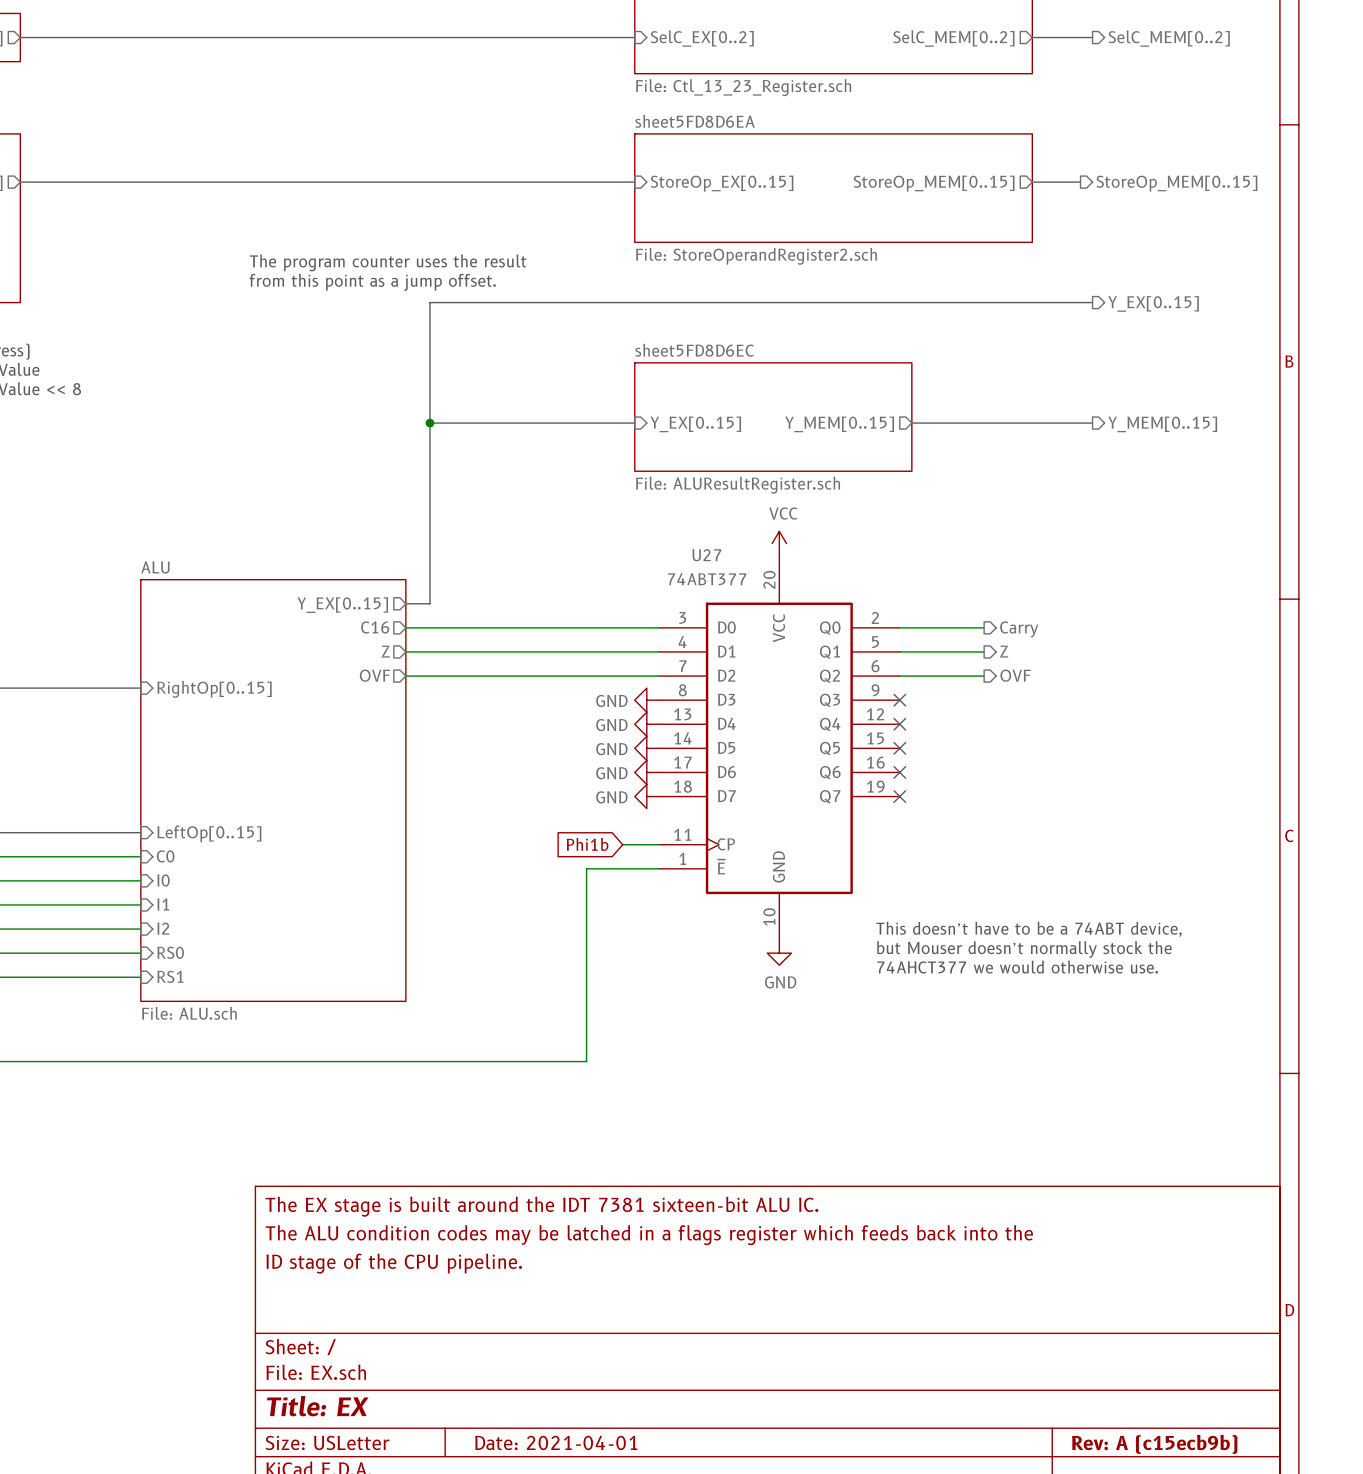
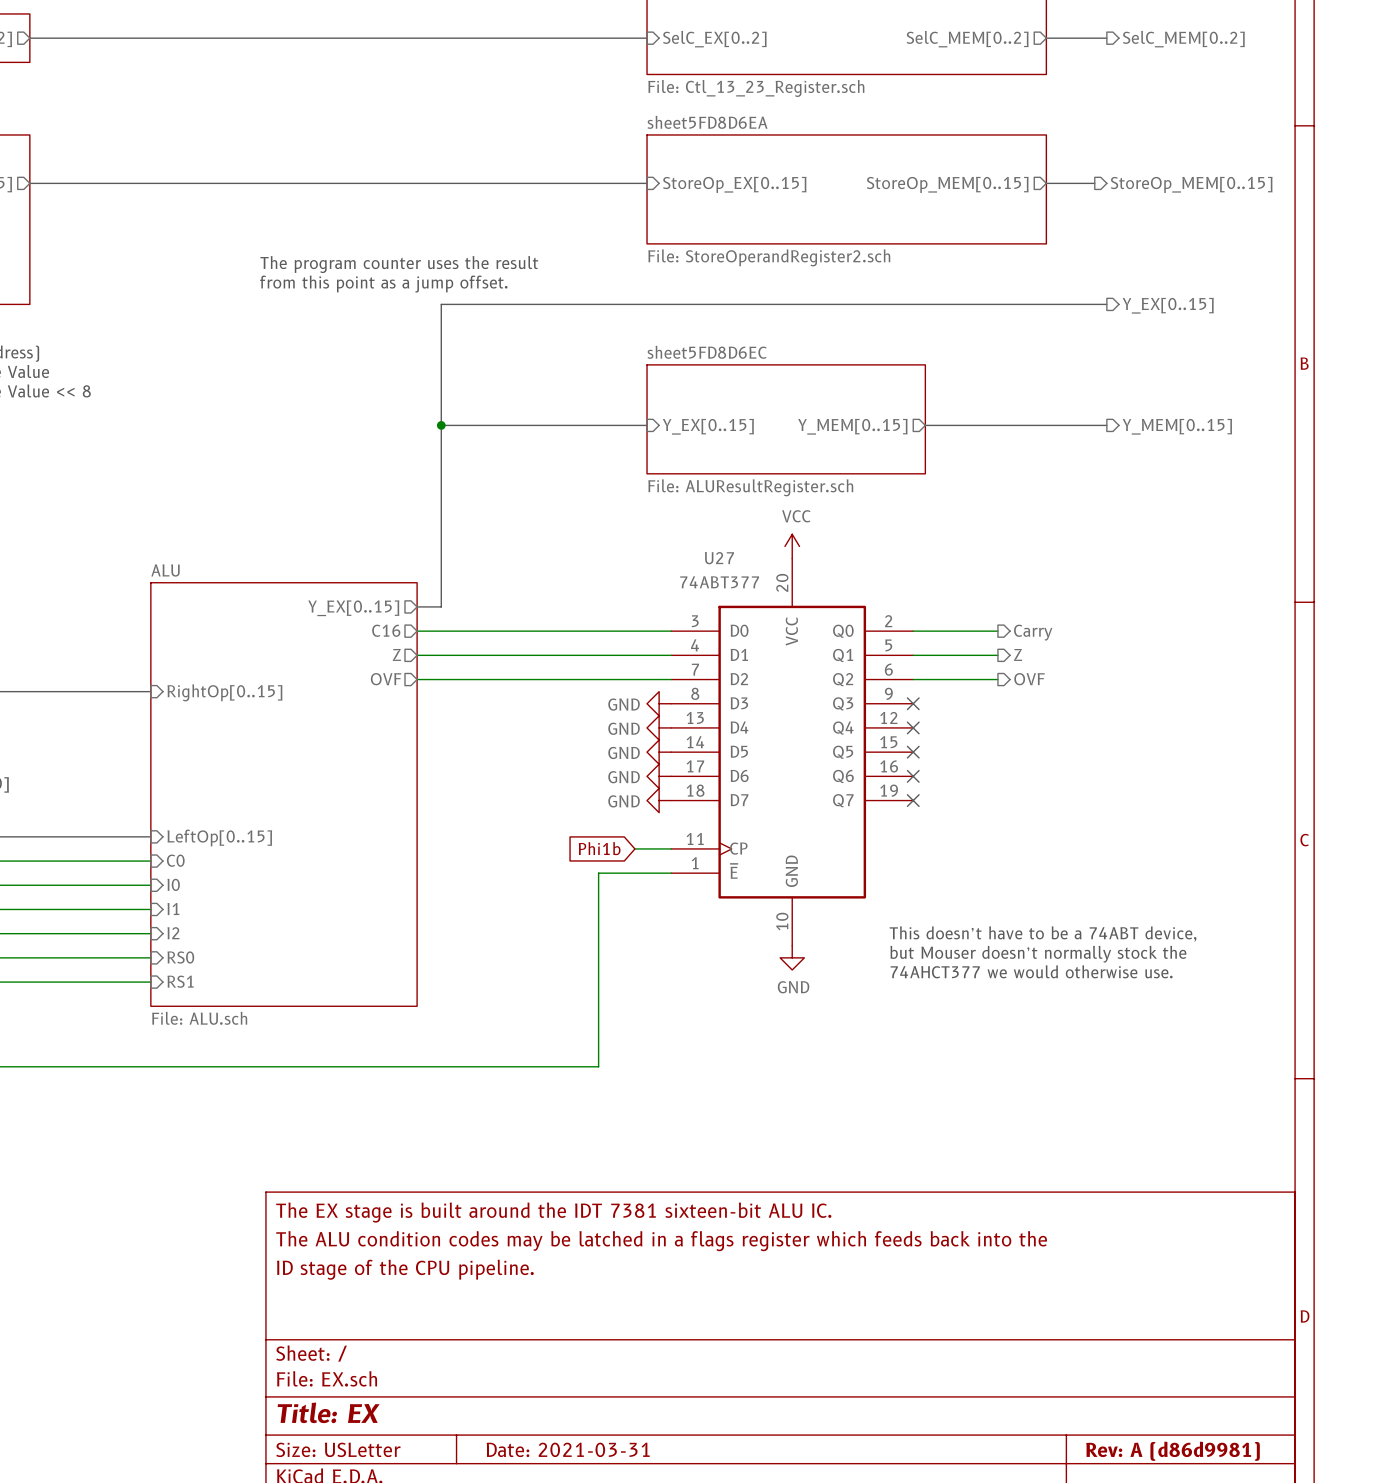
title block: Date: 2021-04-01 (556, 1442) -> Date: 2021-03-31 (568, 1449)
title block: Rev: A (c15ecb9b) (1154, 1444) -> Rev: A (d86d9981) (1173, 1451)

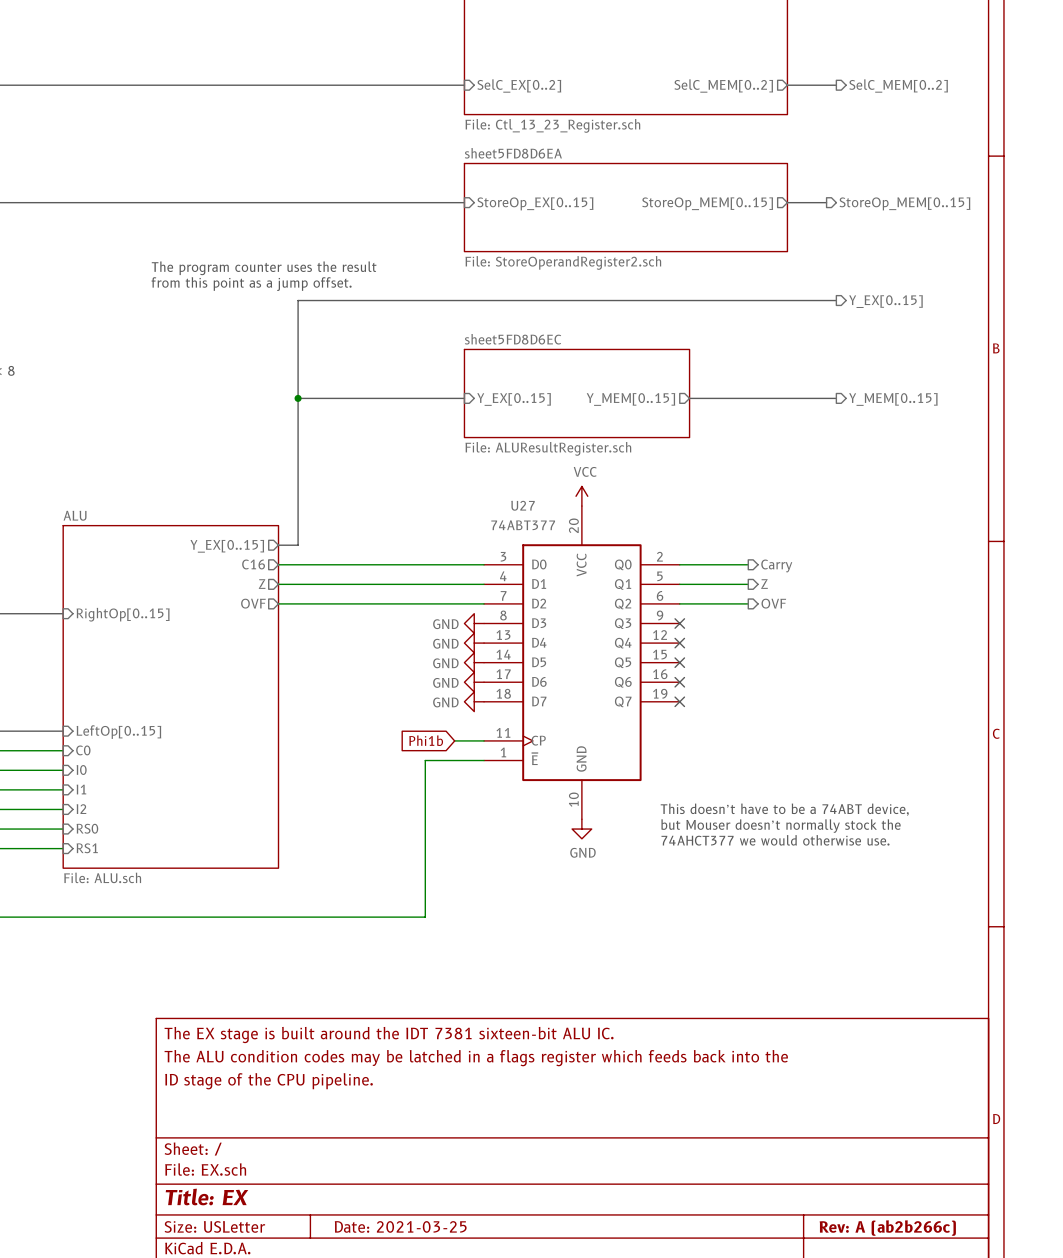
title block: Date: 2021-03-31 (568, 1449) -> Date: 2021-03-25 (400, 1226)
title block: Rev: A (d86d9981) (1173, 1451) -> Rev: A (ab2b266c) (887, 1228)

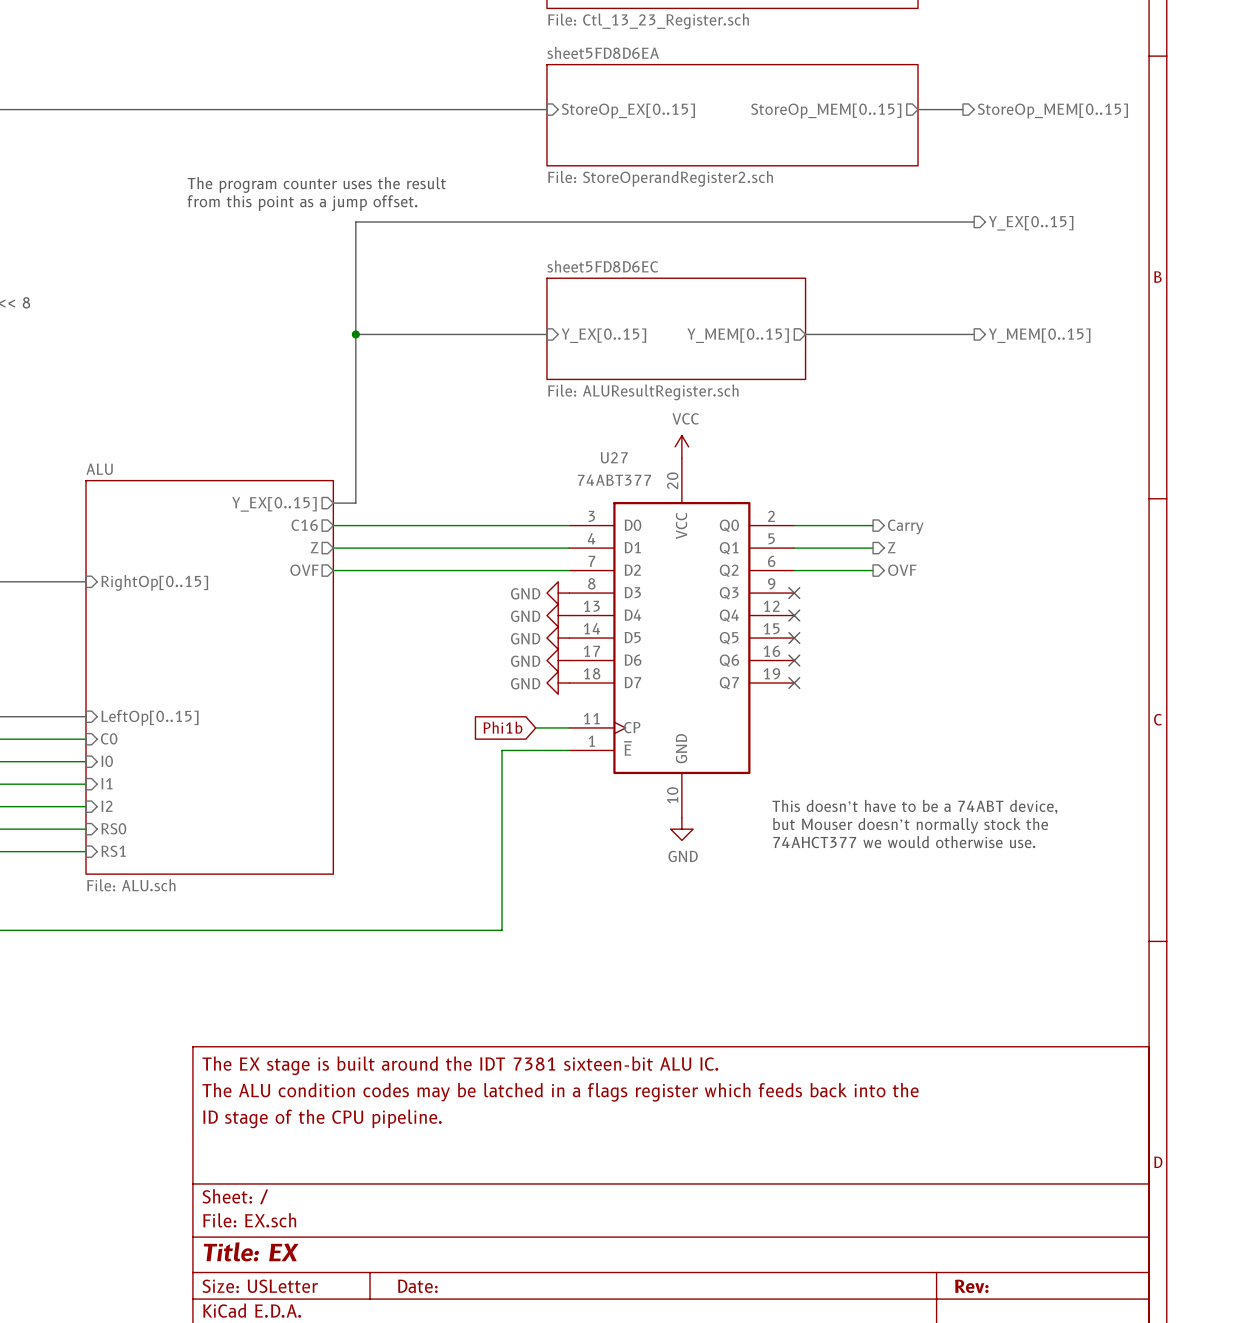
title block: Date: 2021-03-25 (400, 1226) -> Date: (417, 1286)
title block: Rev: A (ab2b266c) (887, 1228) -> Rev: (971, 1286)

